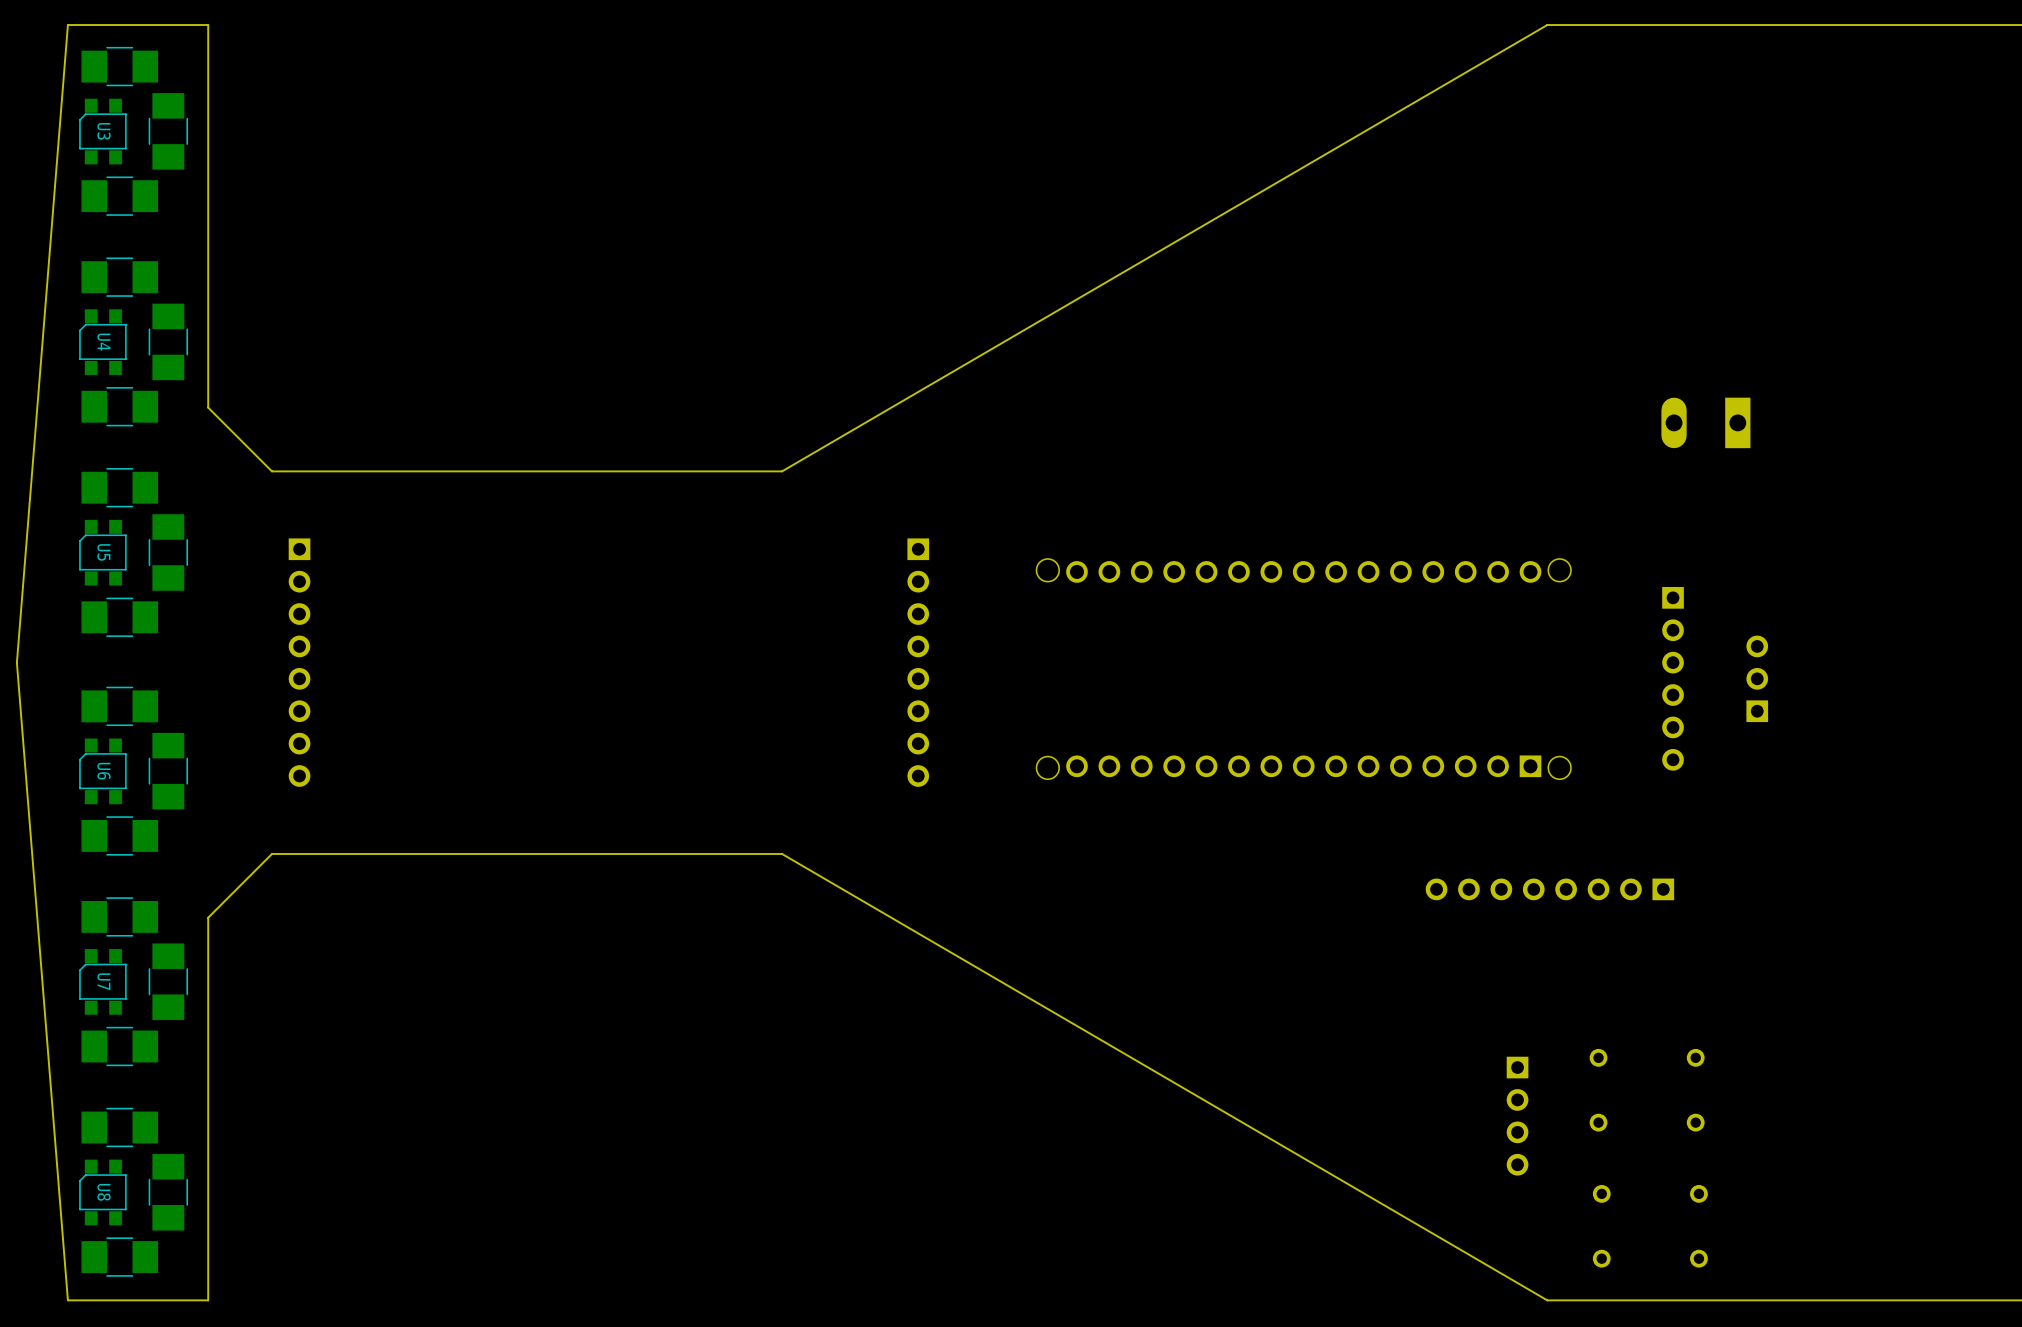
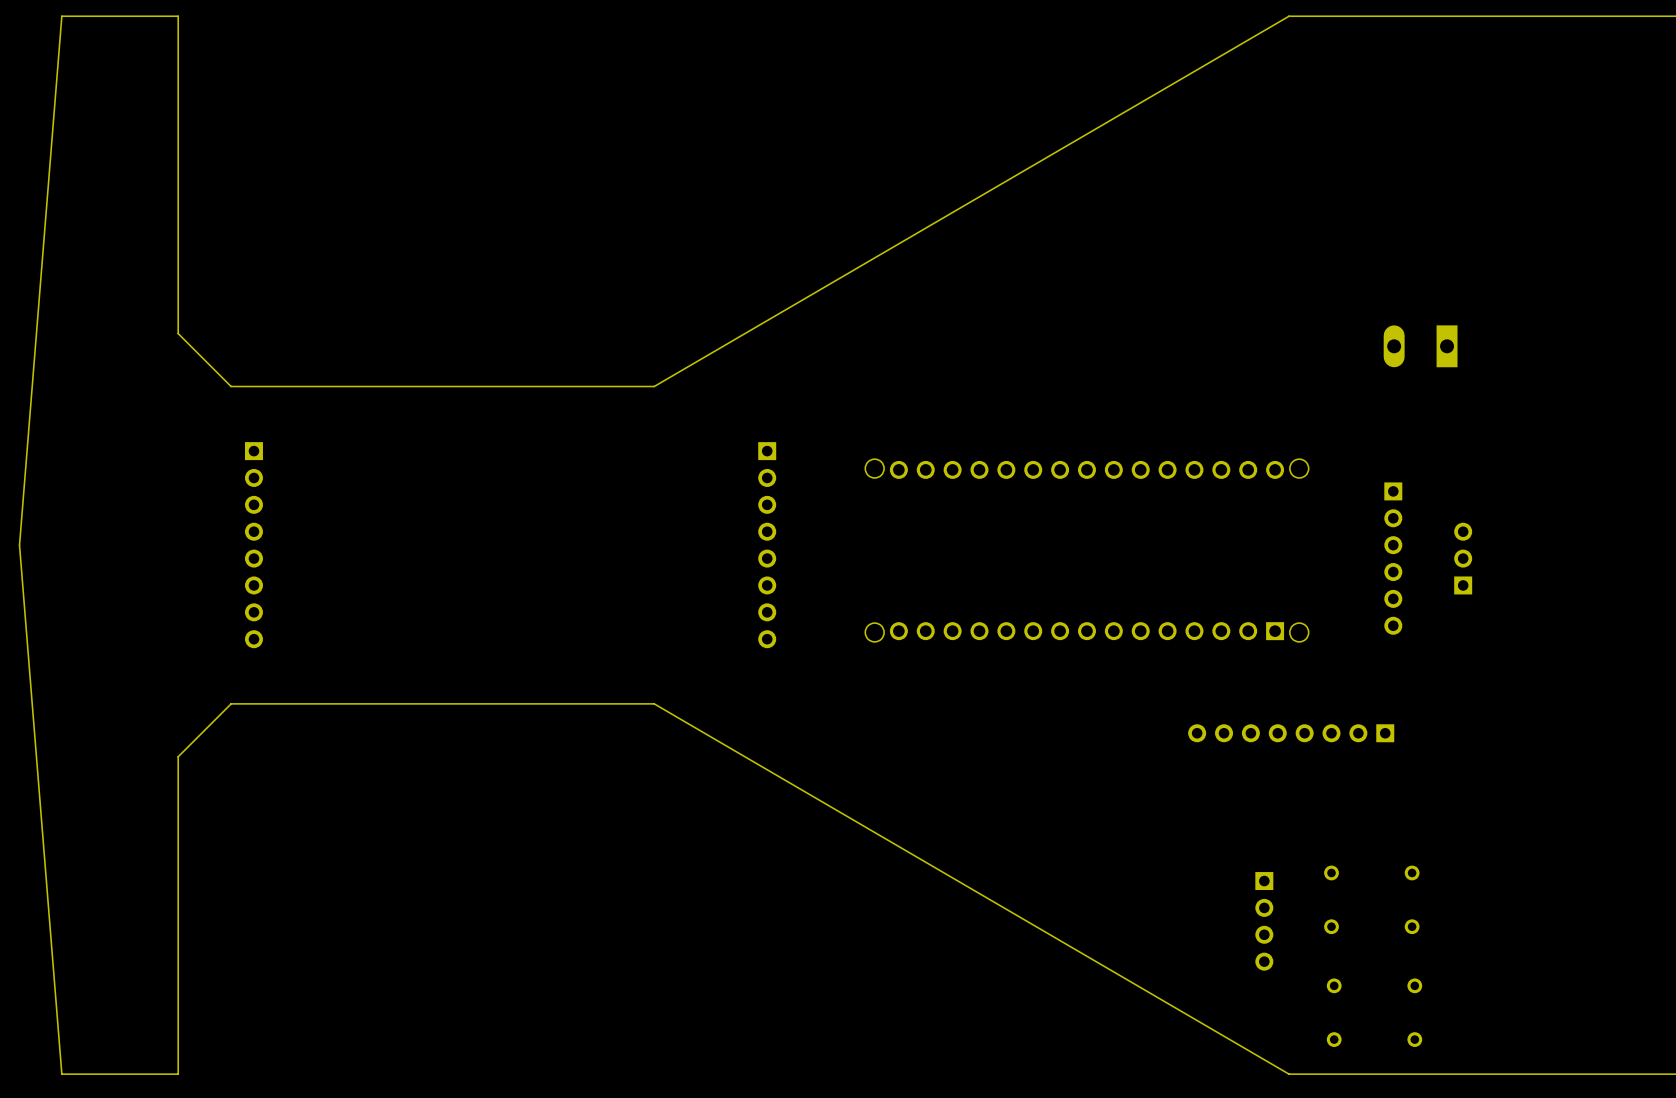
part: (119, 66) -> none
U3: (102, 131) -> none
part: (168, 131) -> none
part: (119, 196) -> none
part: (119, 277) -> none
part: (168, 341) -> none
U4: (102, 342) -> none
part: (119, 406) -> none
part: (119, 487) -> none
U5: (102, 552) -> none
part: (168, 552) -> none
part: (119, 617) -> none
part: (119, 706) -> none
U6: (102, 771) -> none
part: (168, 771) -> none
part: (119, 835) -> none
part: (119, 916) -> none
U7: (102, 981) -> none
part: (168, 981) -> none
part: (119, 1046) -> none
part: (119, 1127) -> none
U8: (102, 1192) -> none
part: (168, 1192) -> none
part: (119, 1257) -> none

